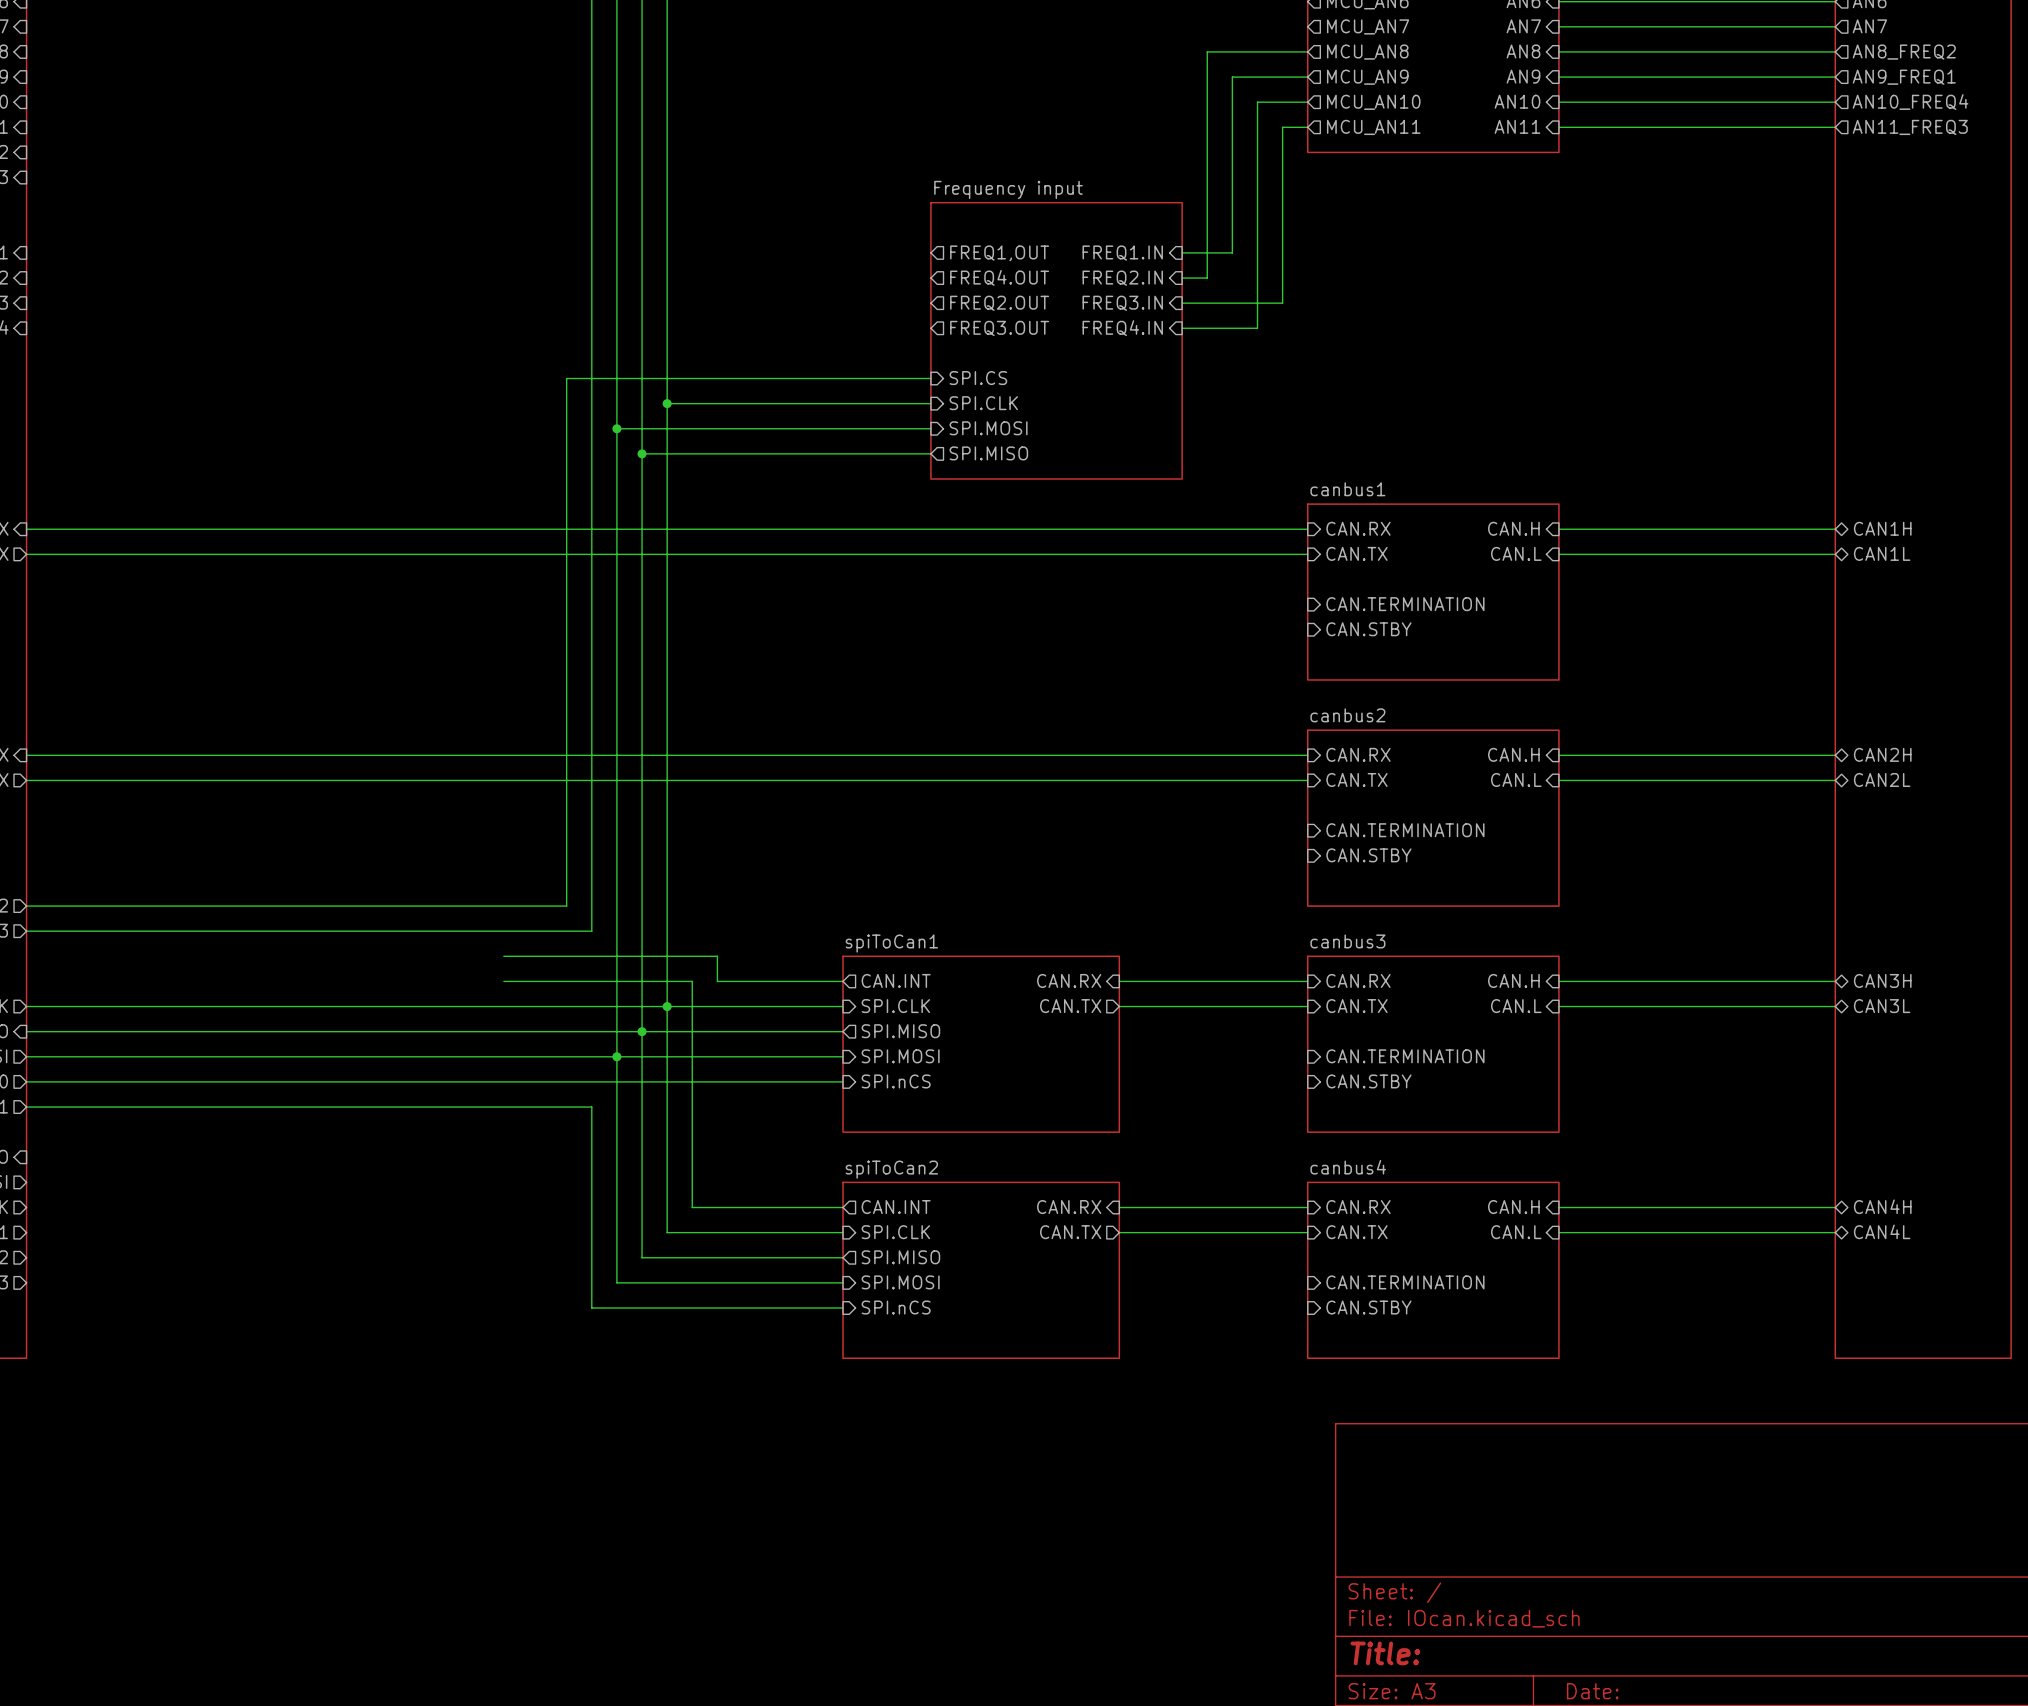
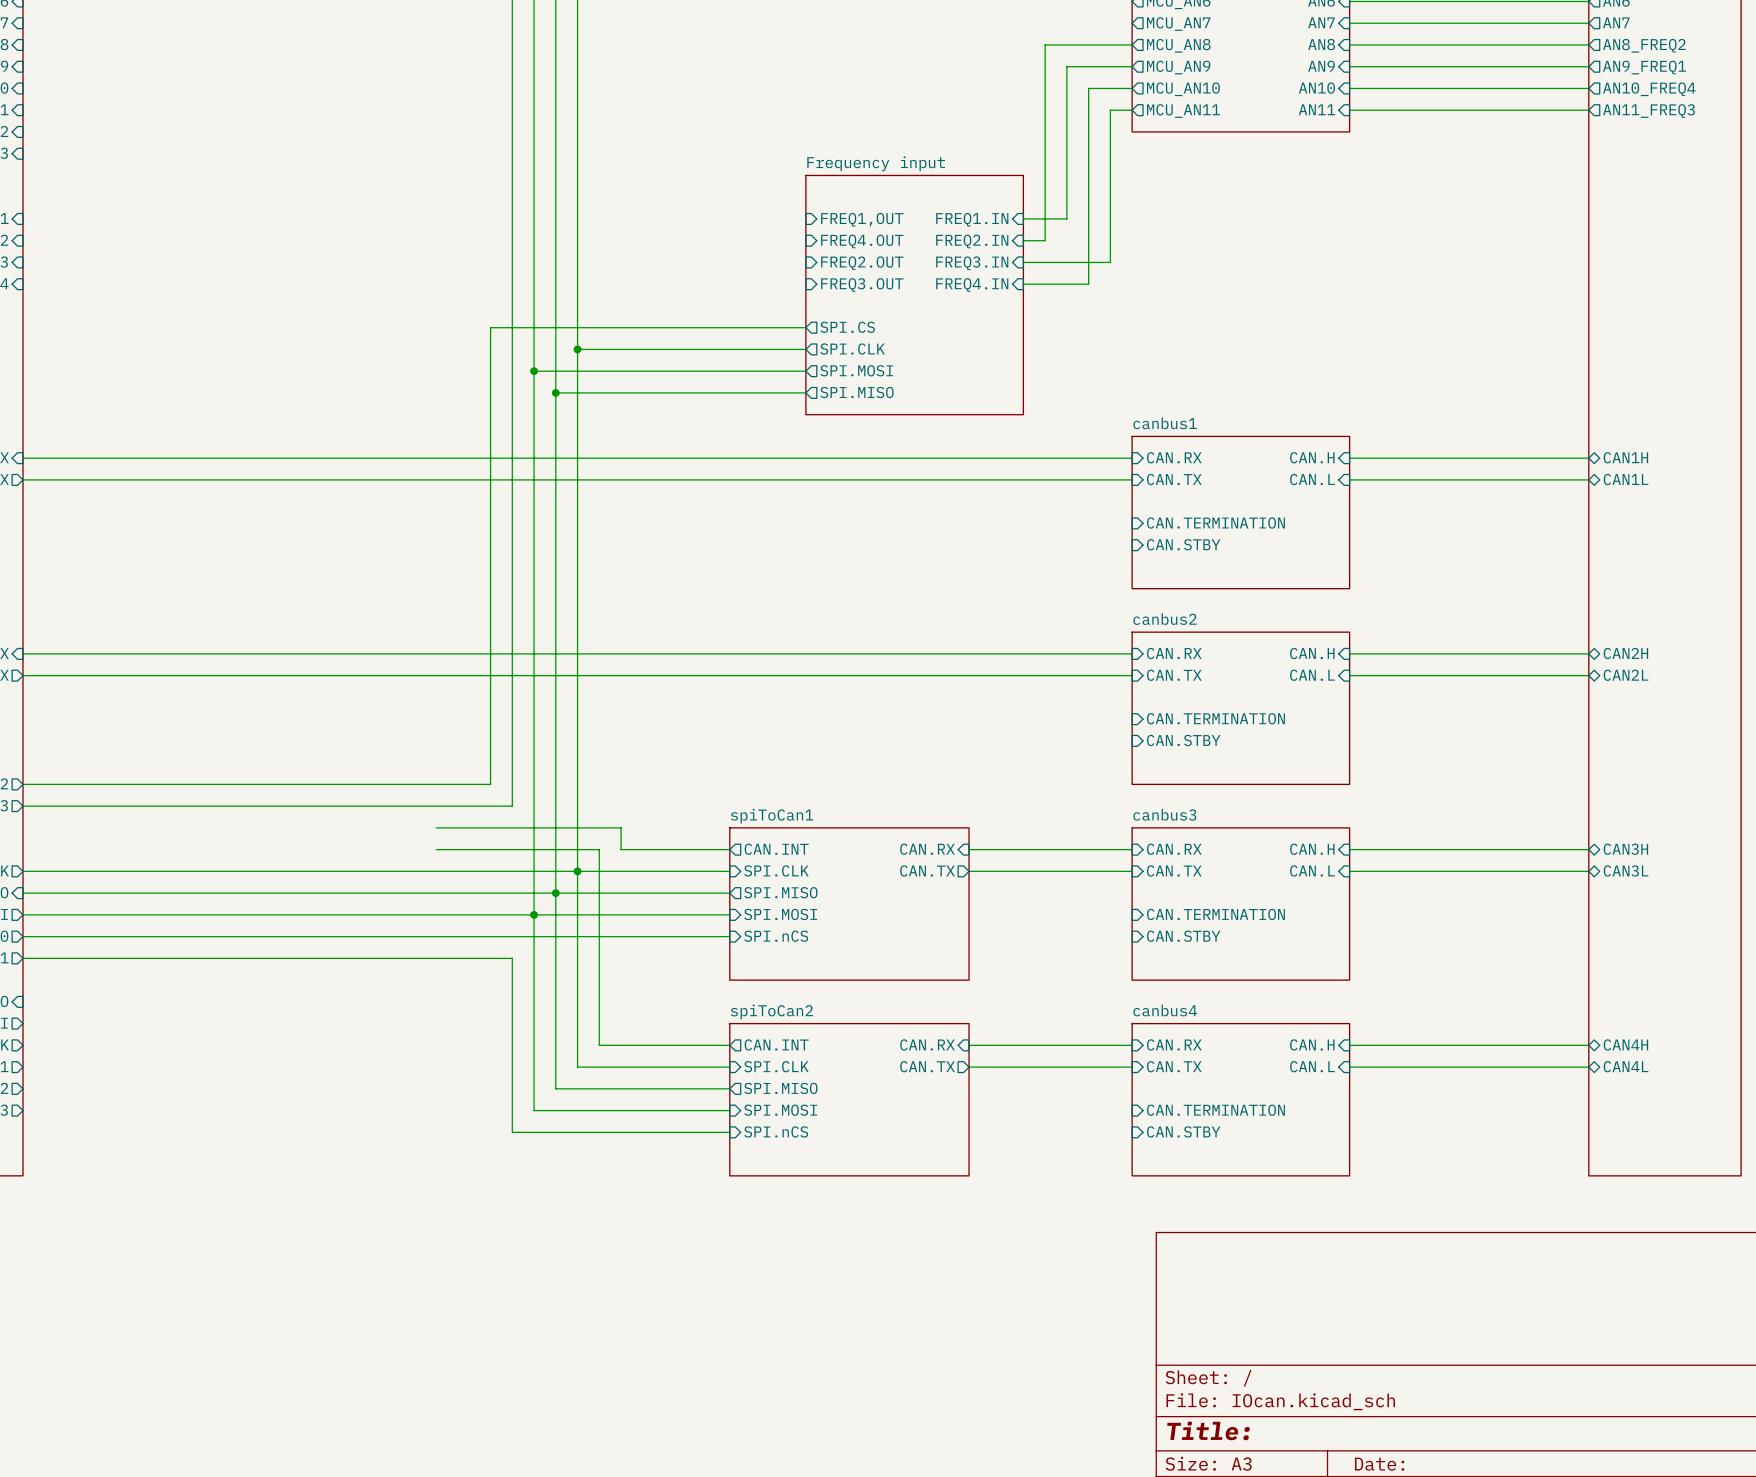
sheet pin shape: output (999, 253) -> input (862, 219)
sheet pin shape: output (999, 277) -> input (862, 241)
sheet pin shape: output (999, 303) -> input (862, 263)
sheet pin shape: output (999, 328) -> input (862, 284)
sheet pin shape: input (978, 378) -> output (847, 327)
sheet pin shape: input (983, 403) -> output (852, 349)
sheet pin shape: input (988, 428) -> output (856, 370)

